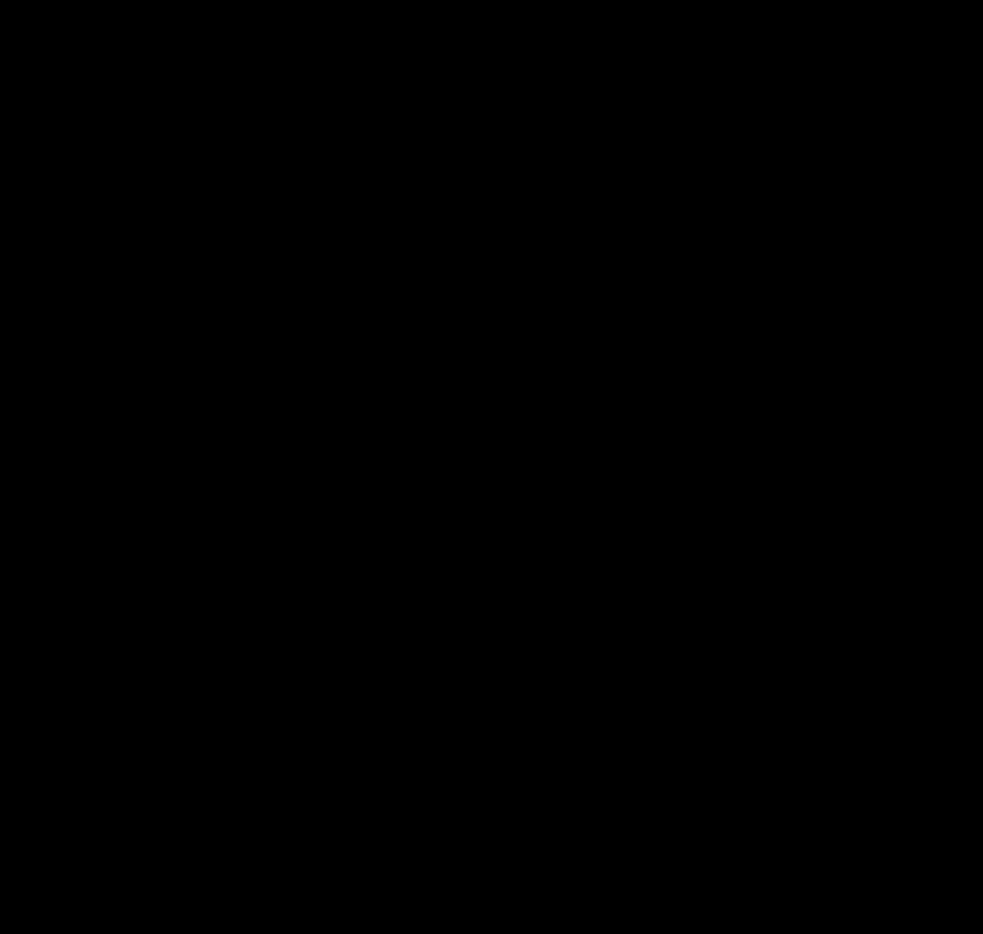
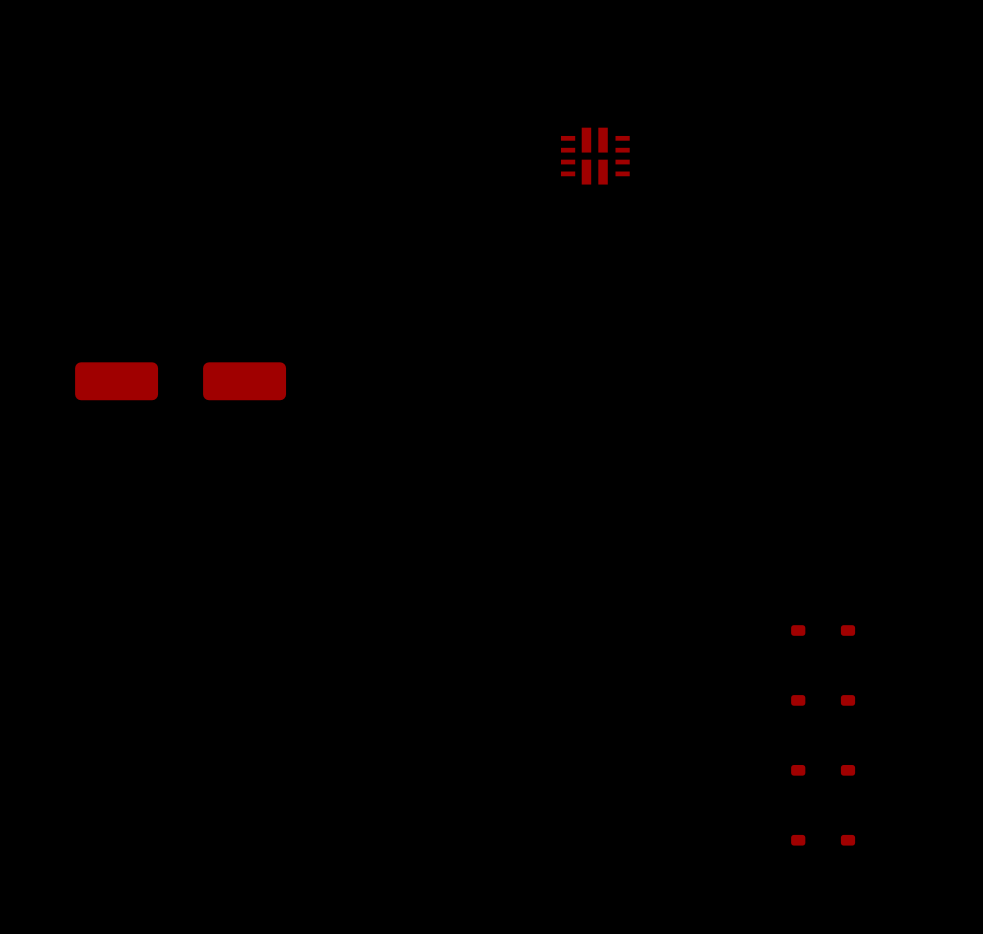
part: none -> (595, 156)
part: none -> (180, 381)
part: none -> (823, 630)
part: none -> (823, 700)
part: none -> (823, 770)
part: none -> (823, 840)

